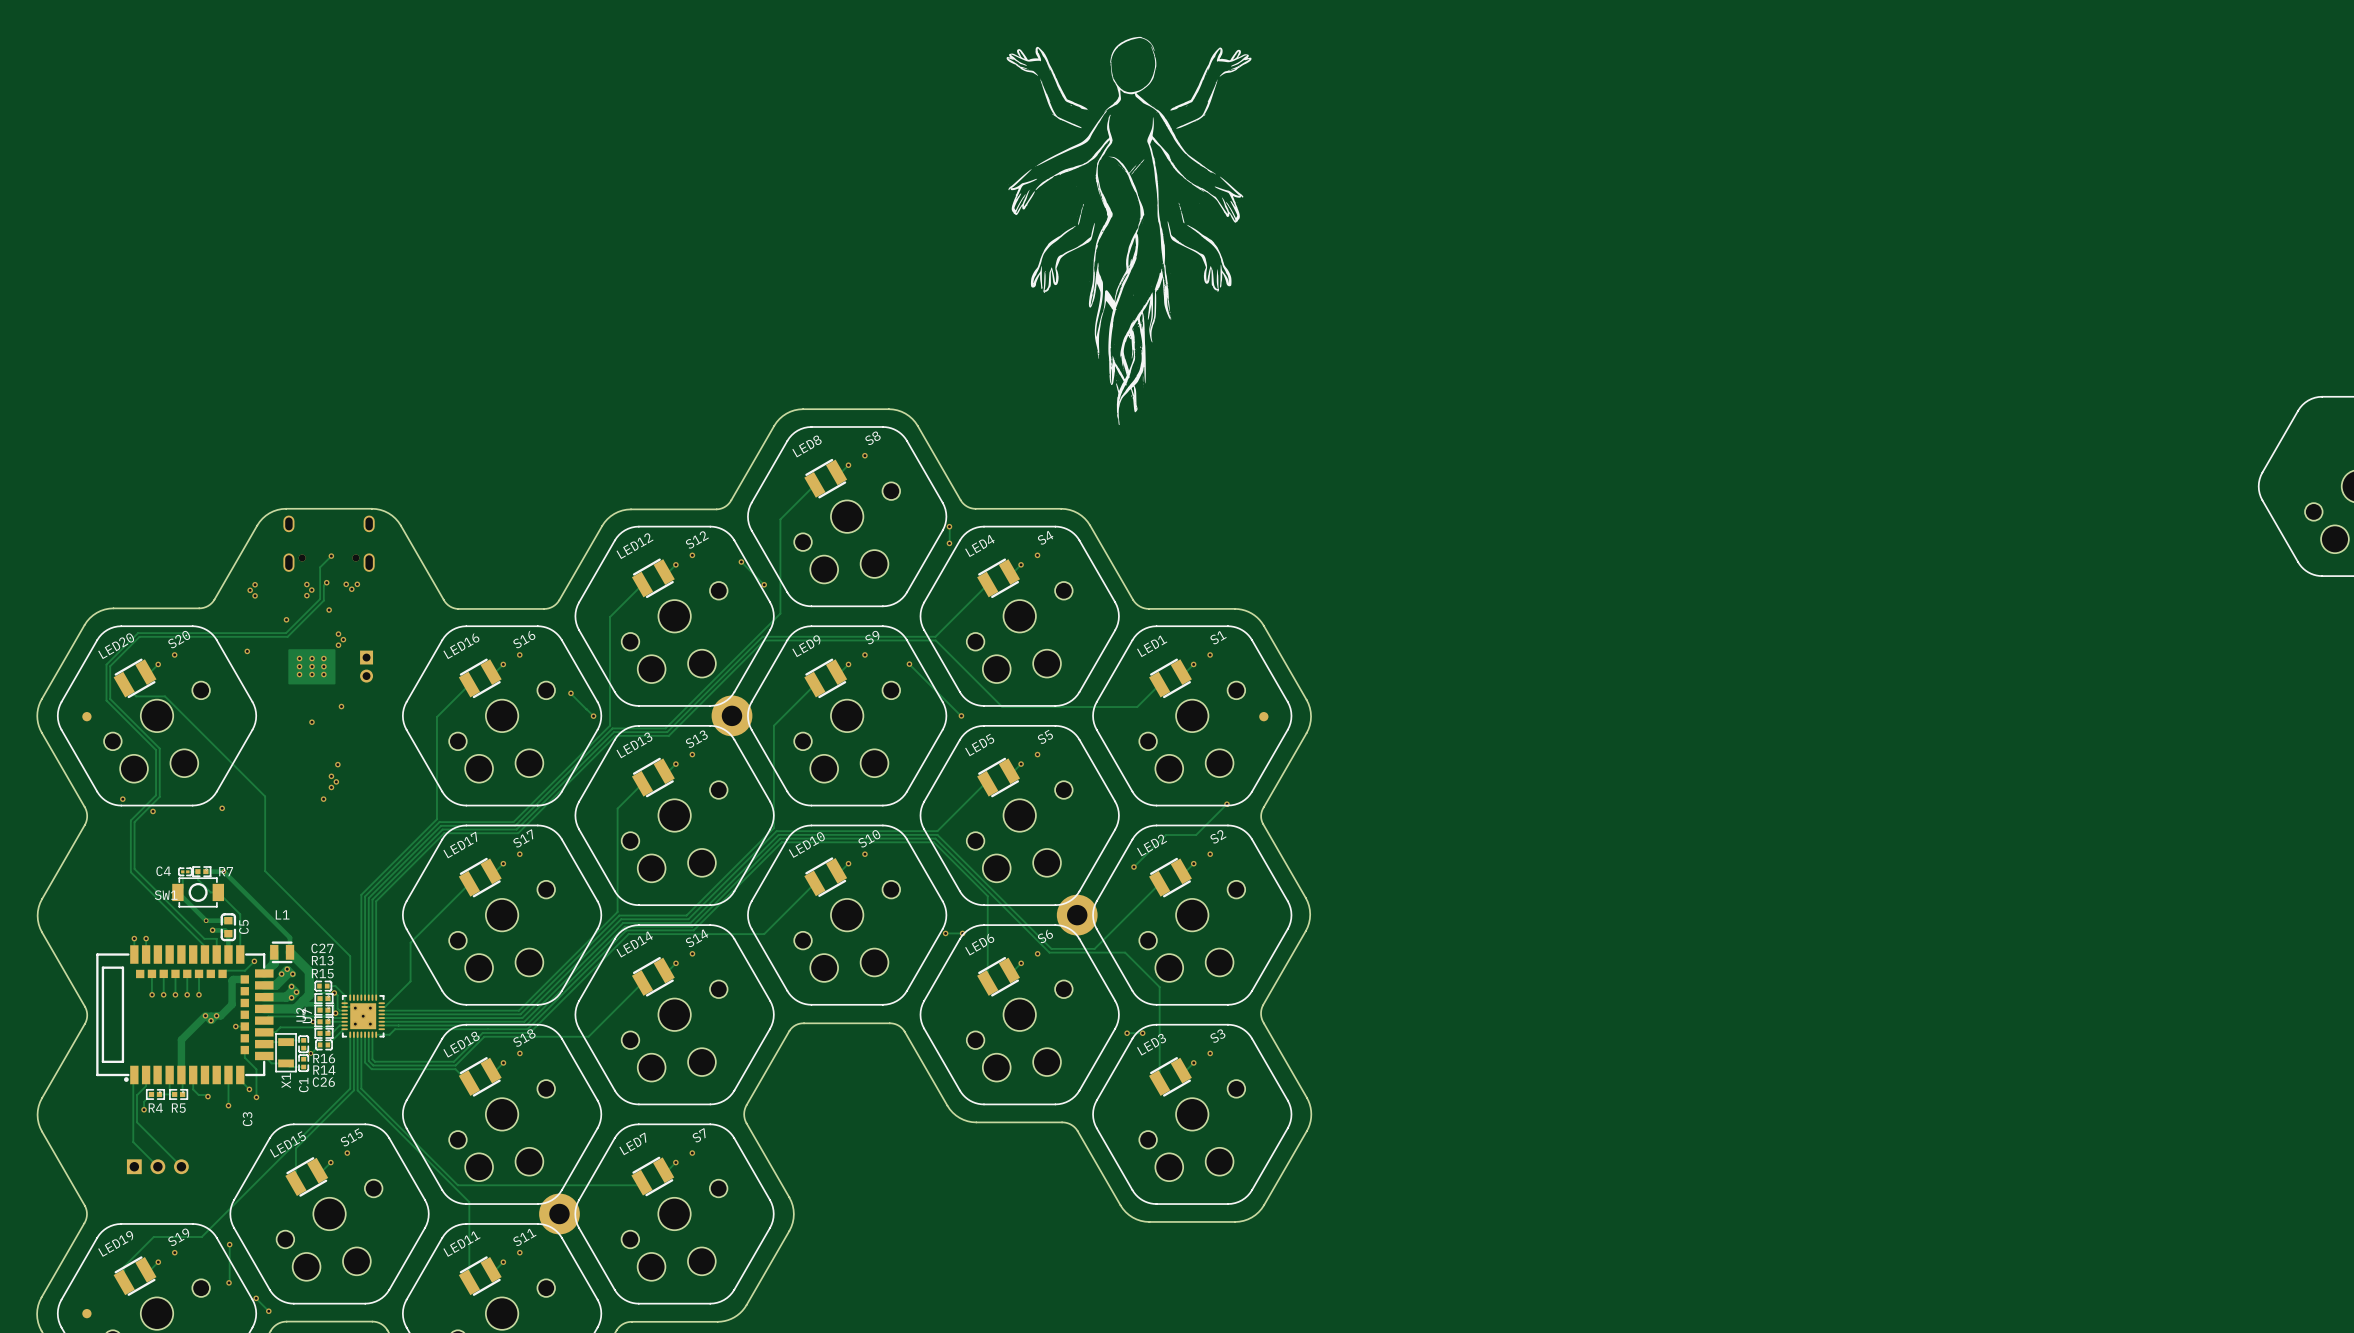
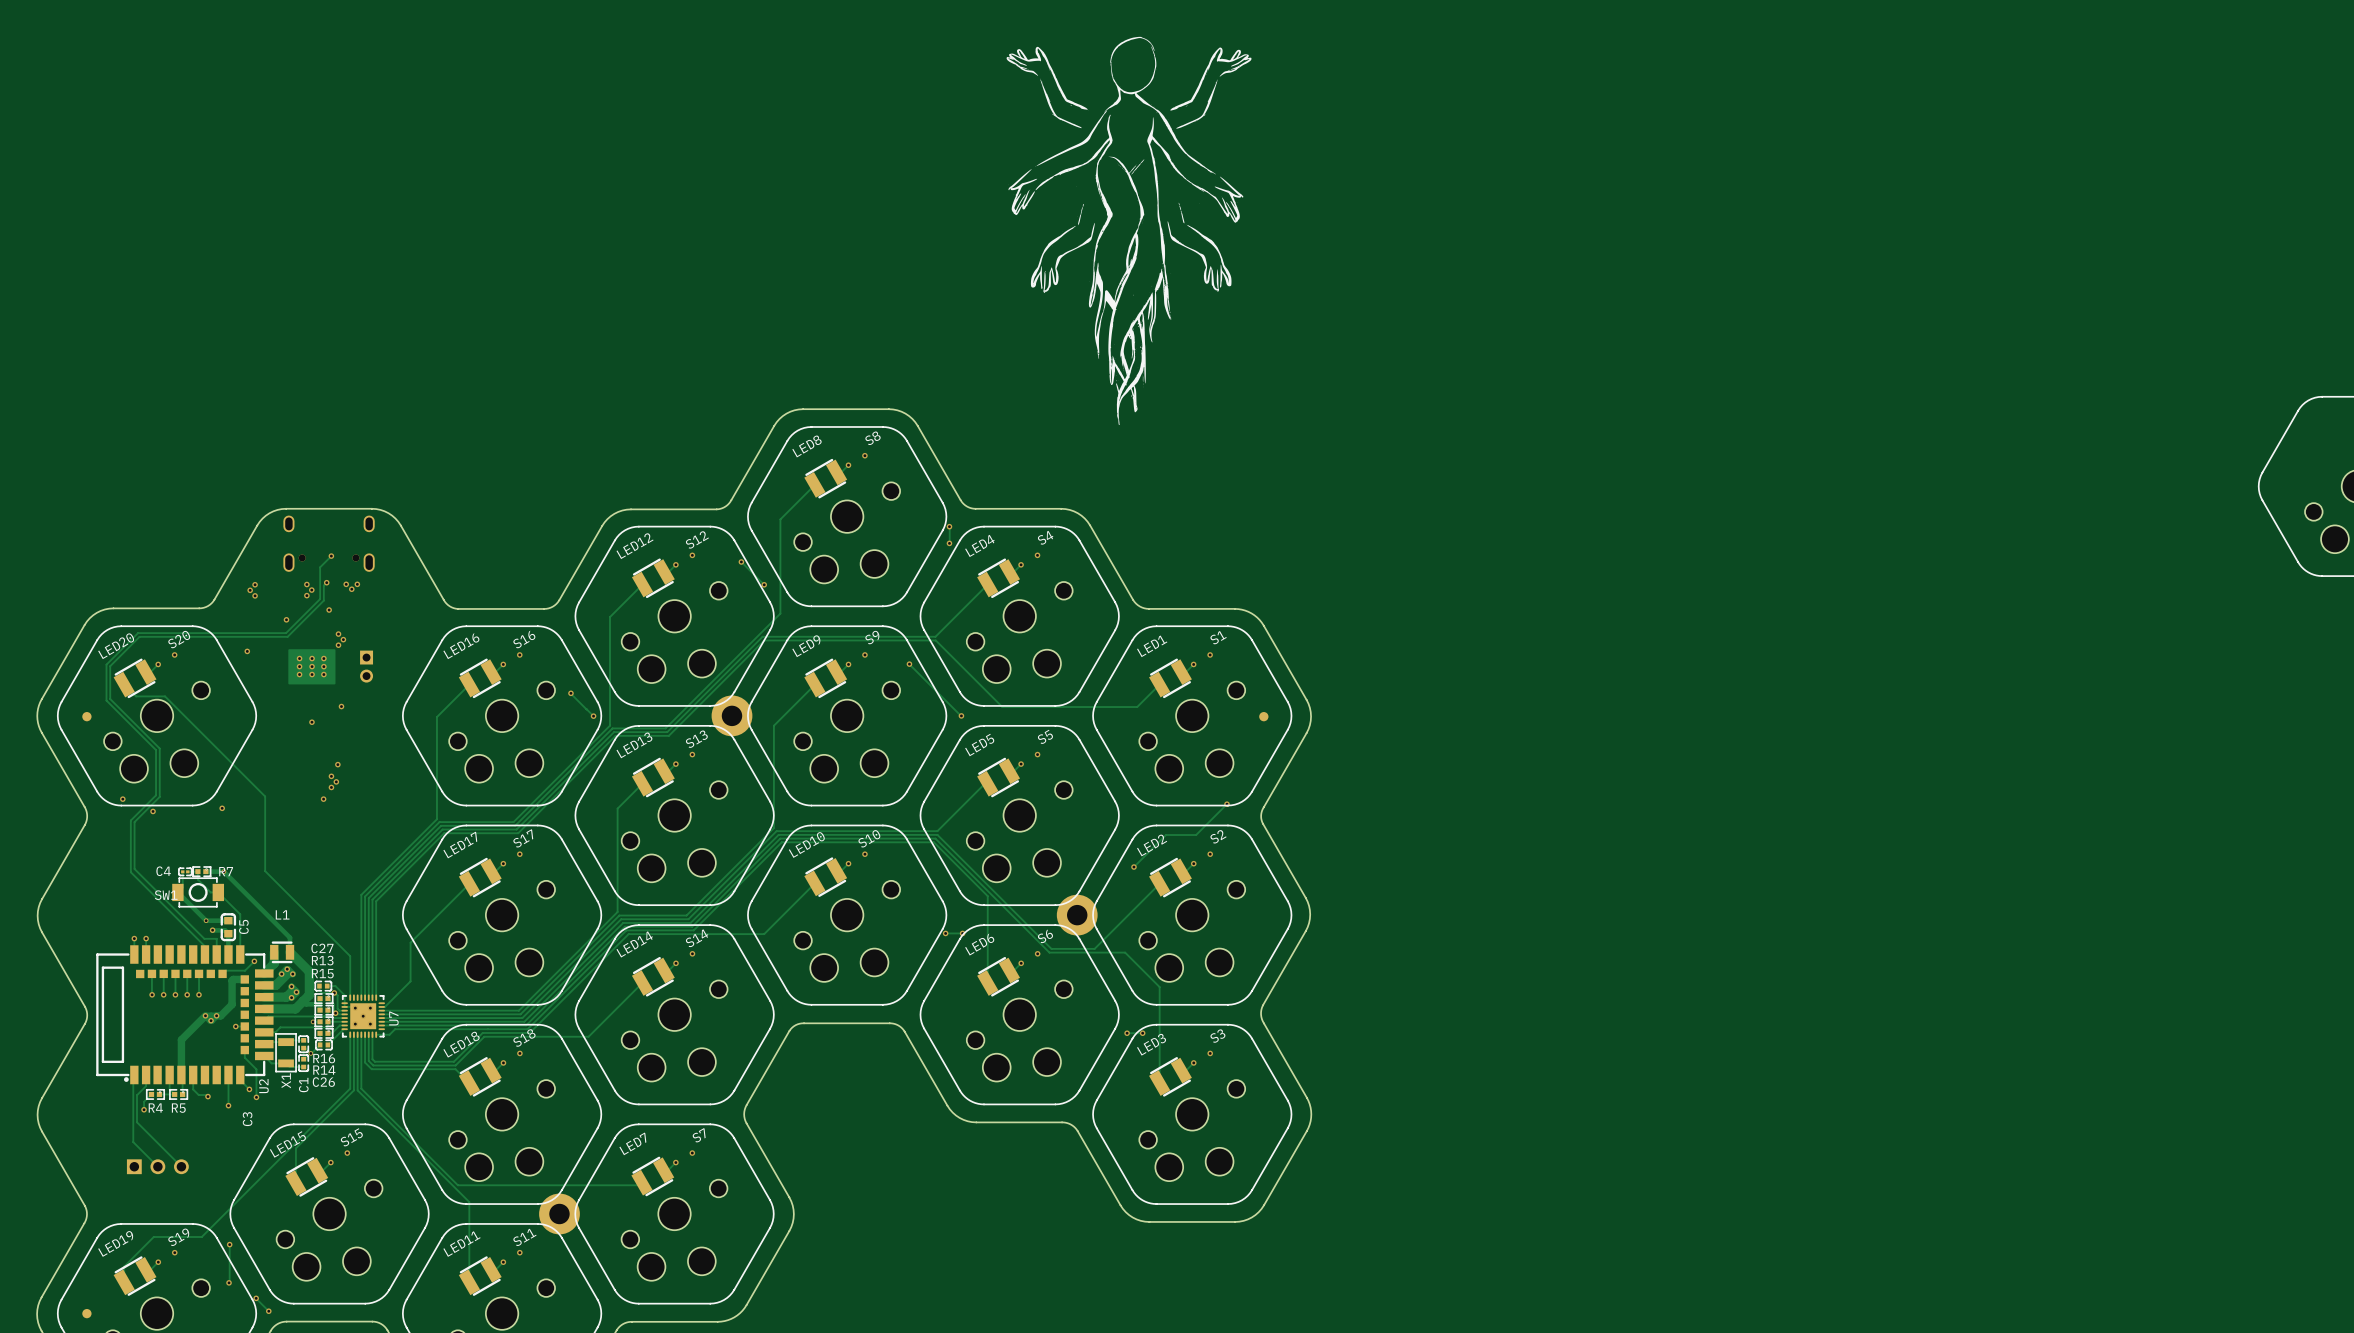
U2 name position: U2 (300, 1014) -> U2 (263, 1086)
U7 name position: U7 (307, 1016) -> U7 (393, 1018)

